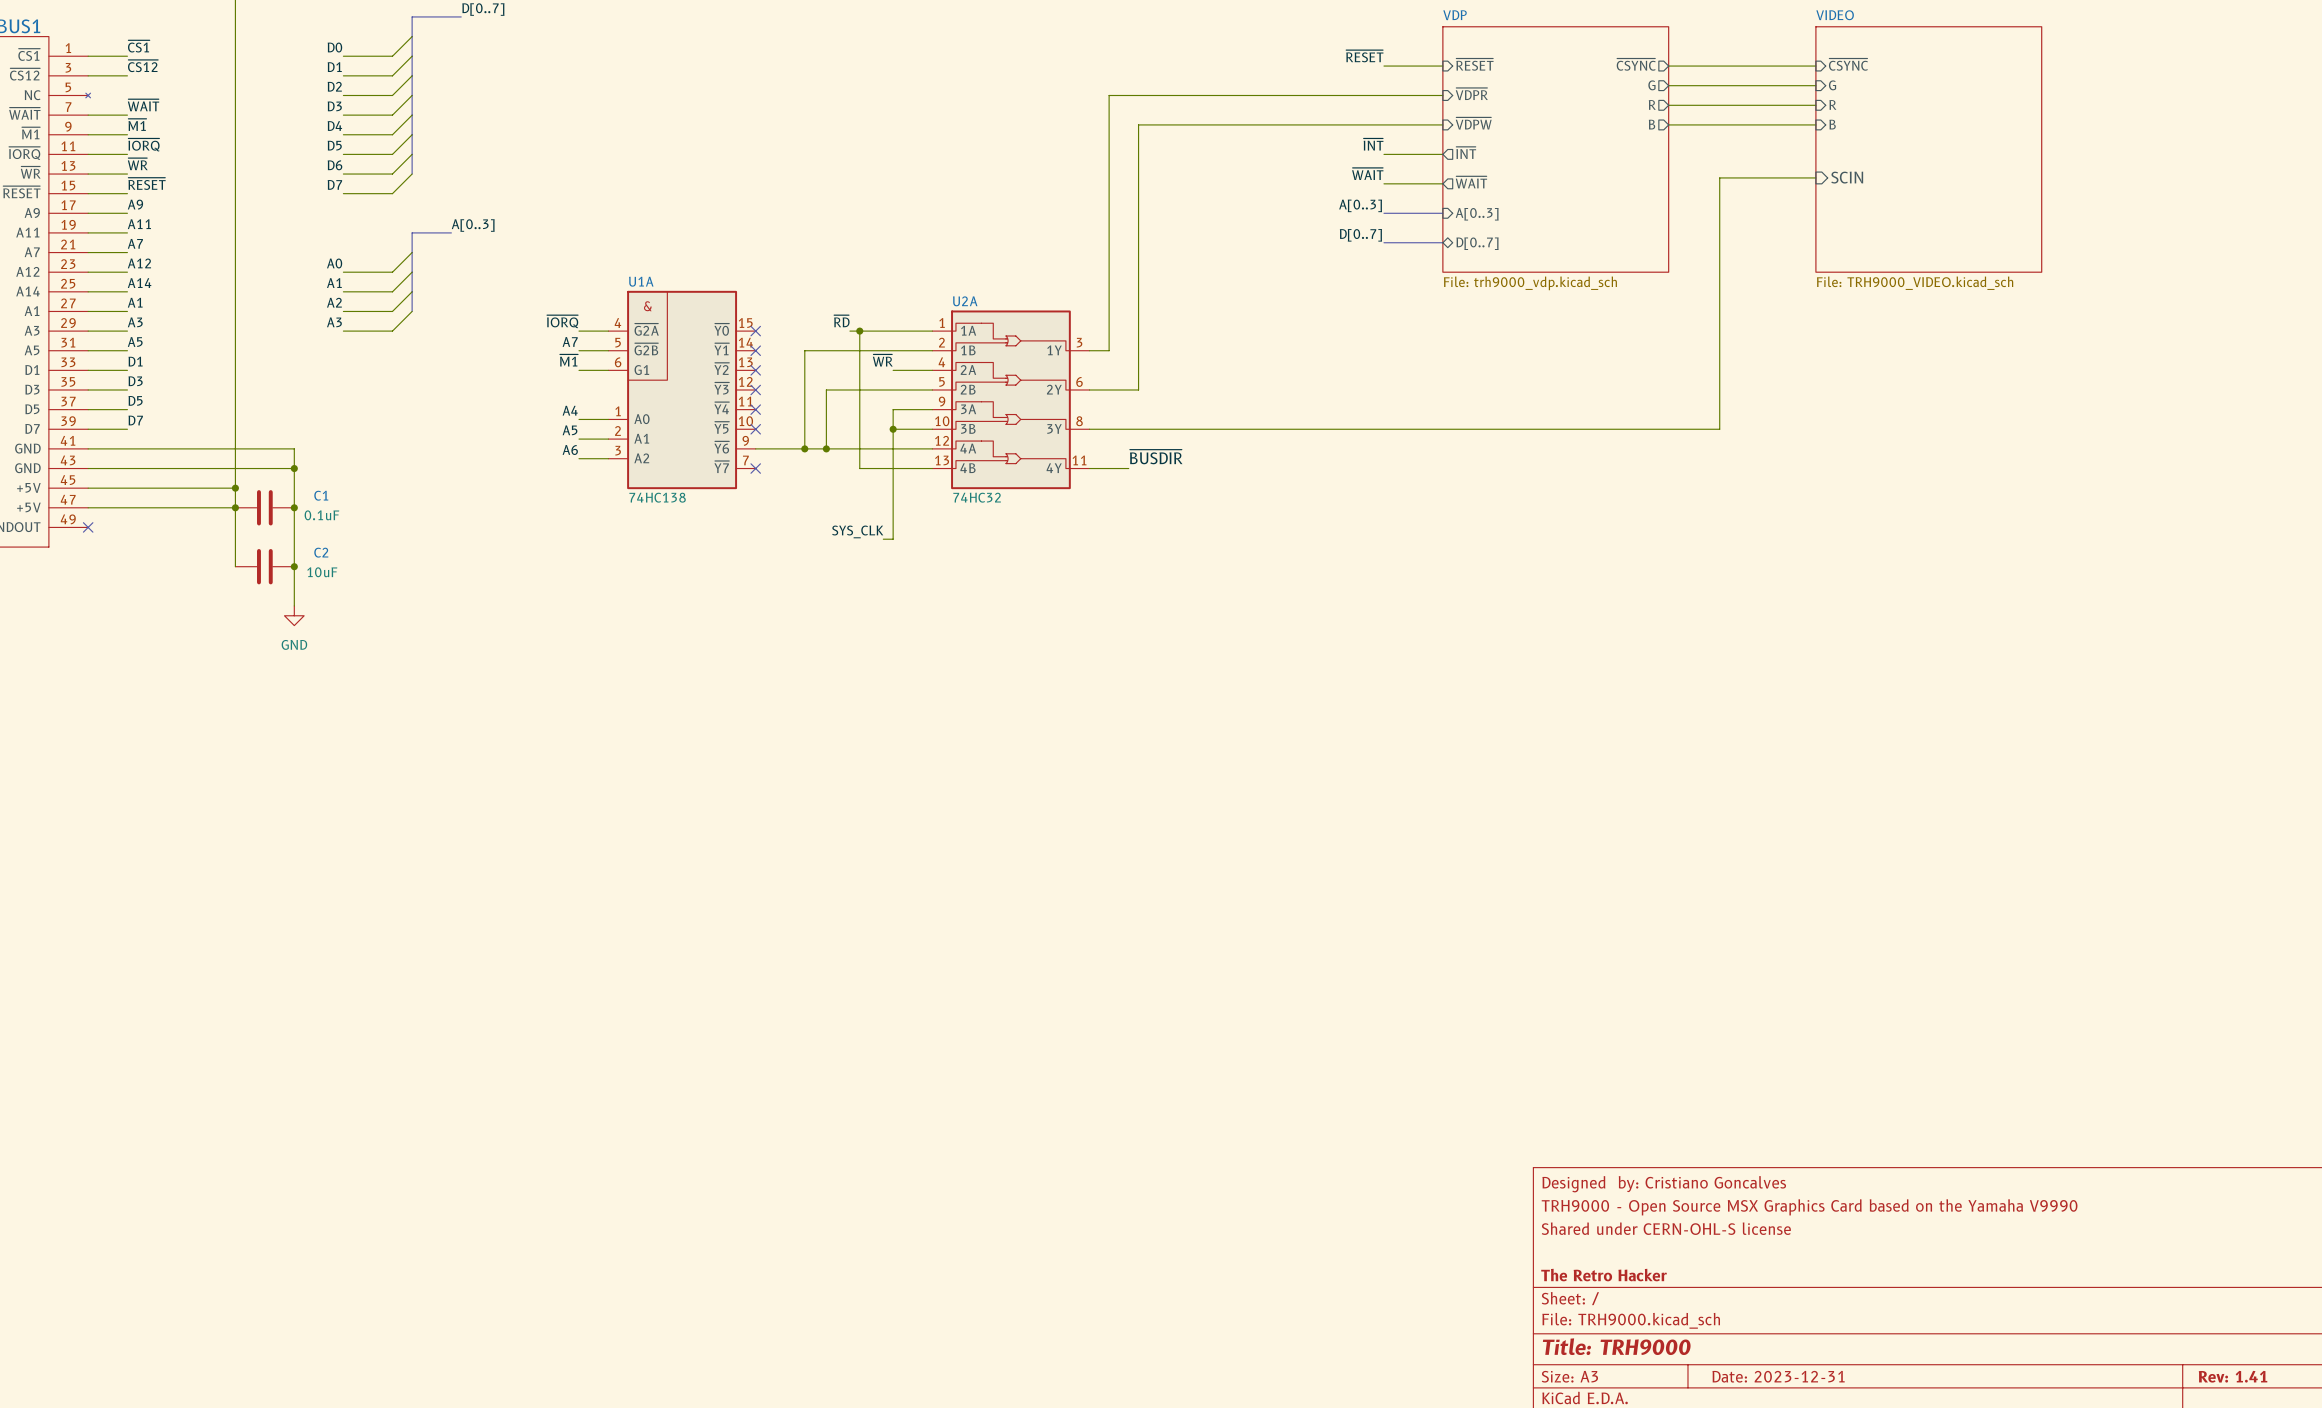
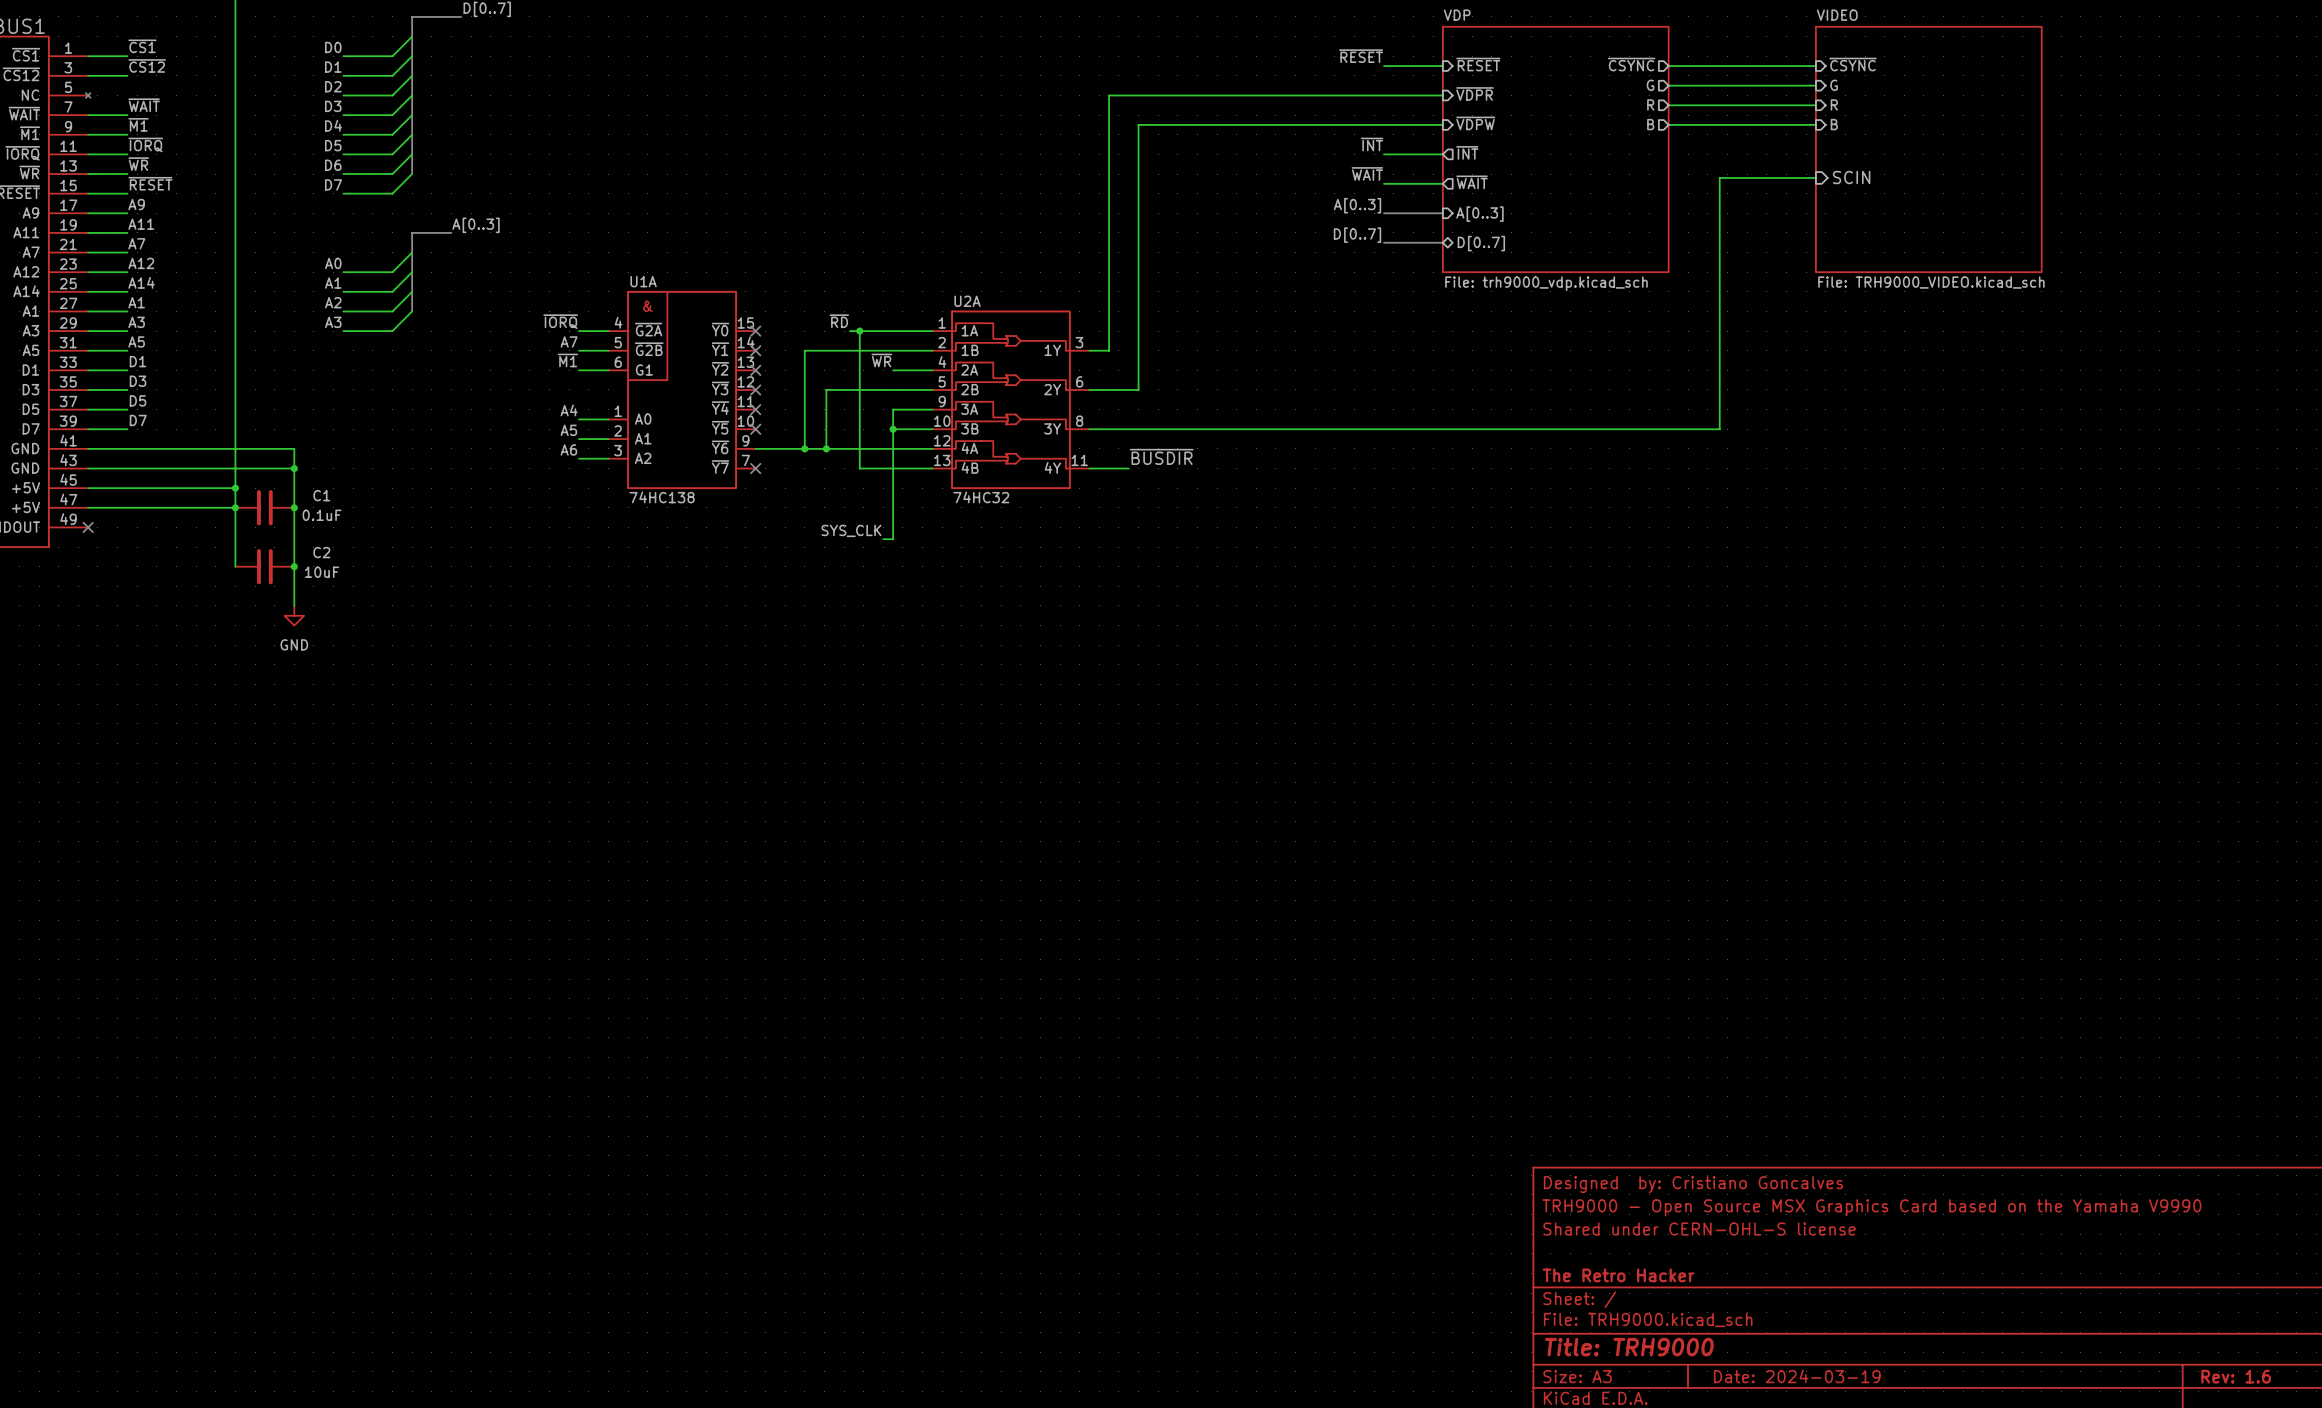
title block: Date: 2023-12-31 (1778, 1376) -> Date: 2024-03-19 (1797, 1376)
title block: Rev: 1.41 (2233, 1376) -> Rev: 1.6 (2236, 1376)

